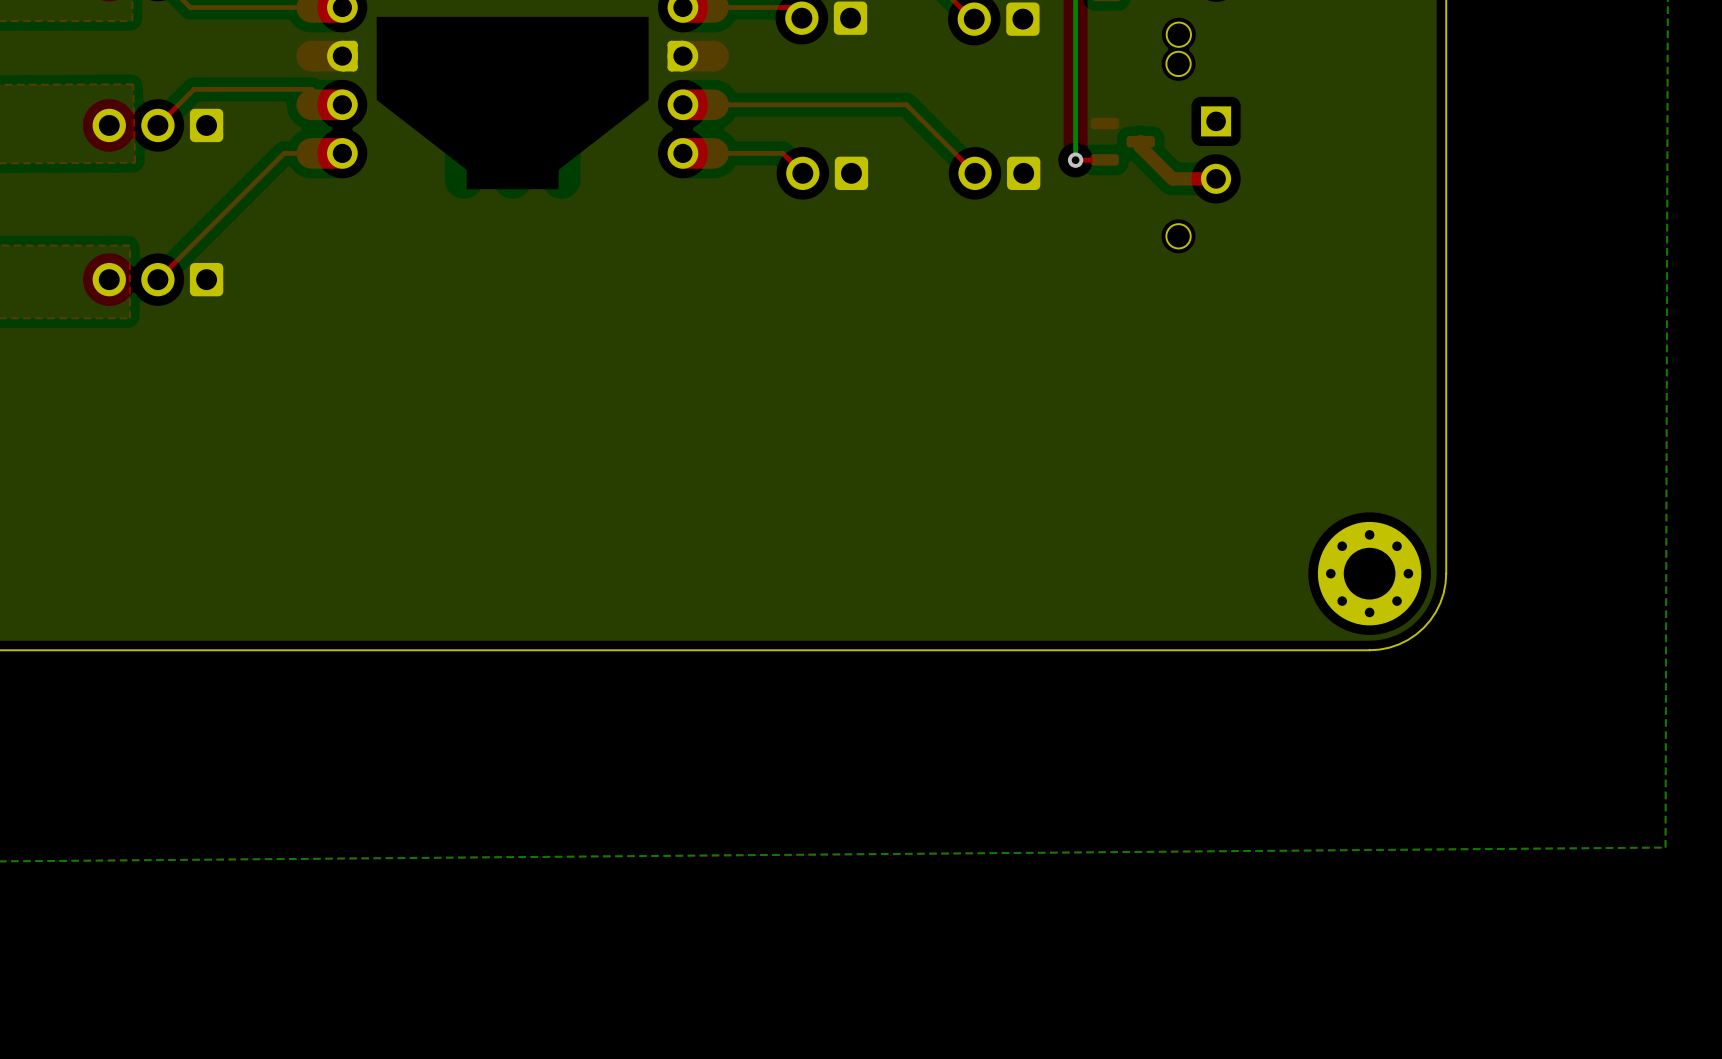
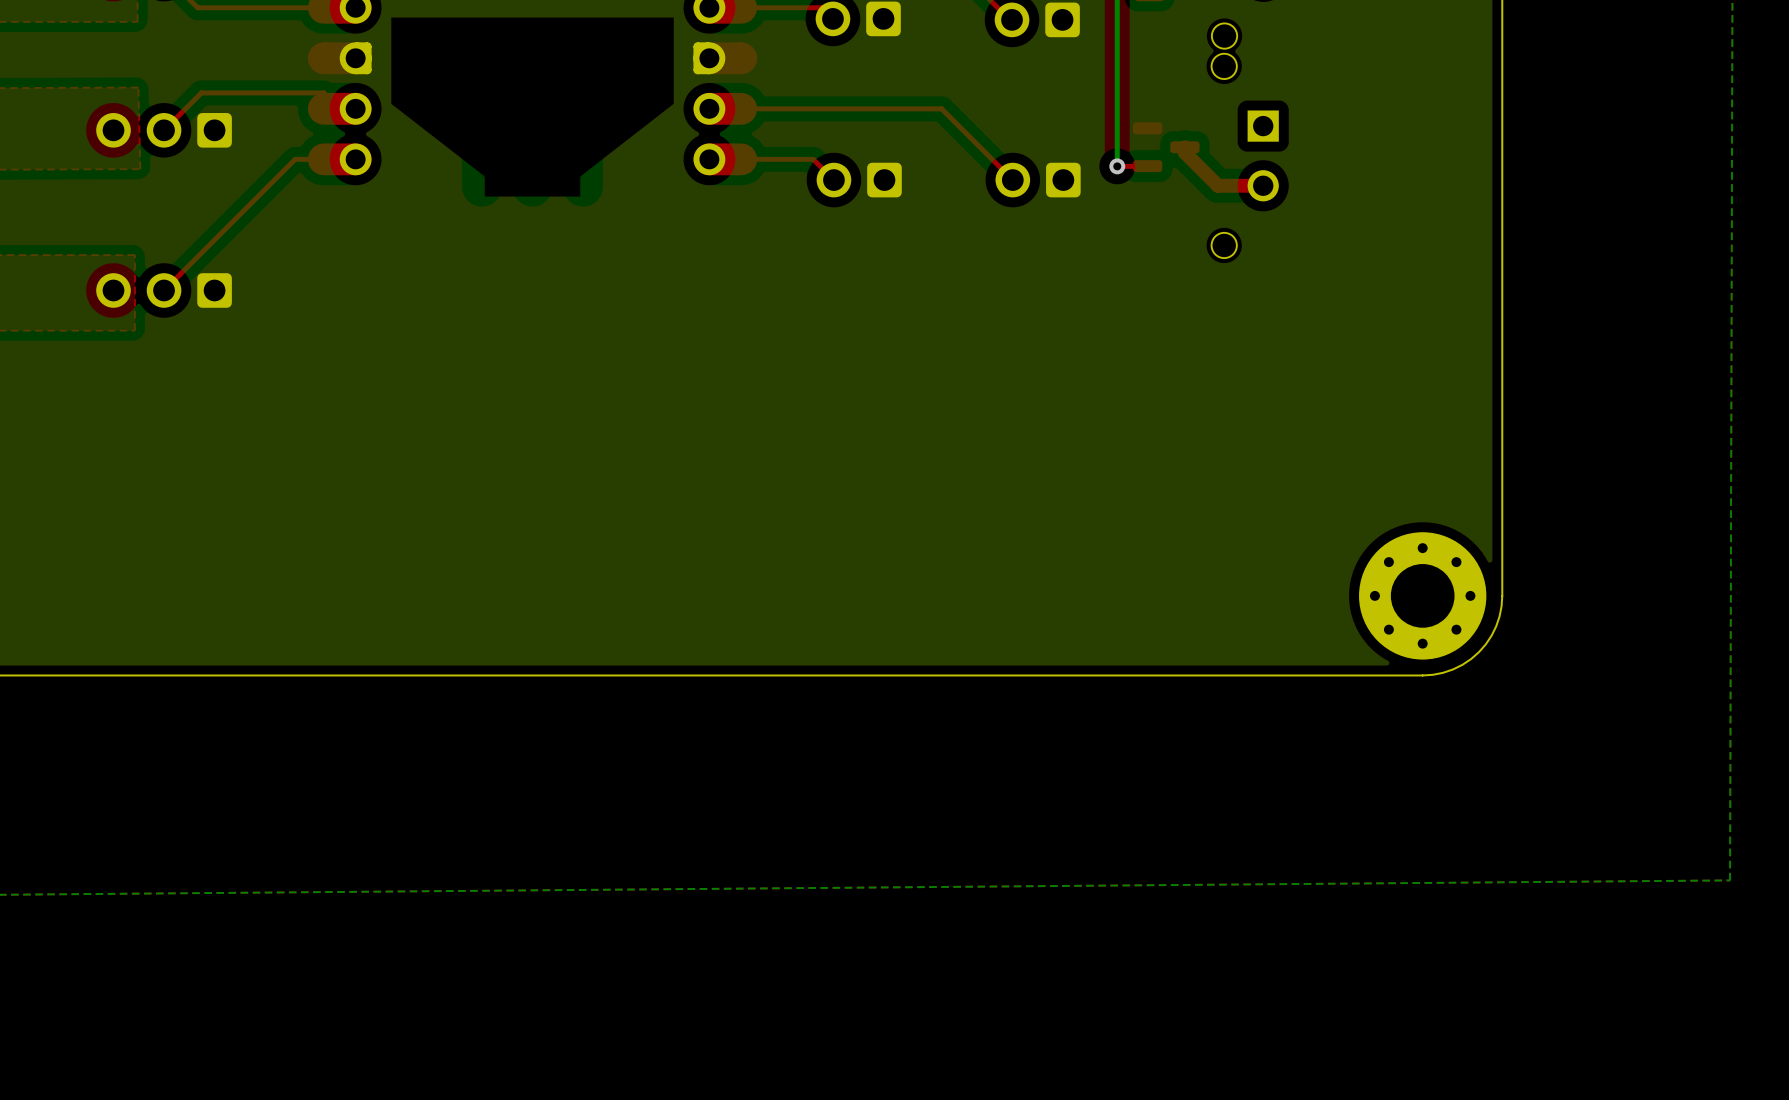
part footprint: [1317, 521, 1422, 626] -> [1359, 532, 1487, 660]

